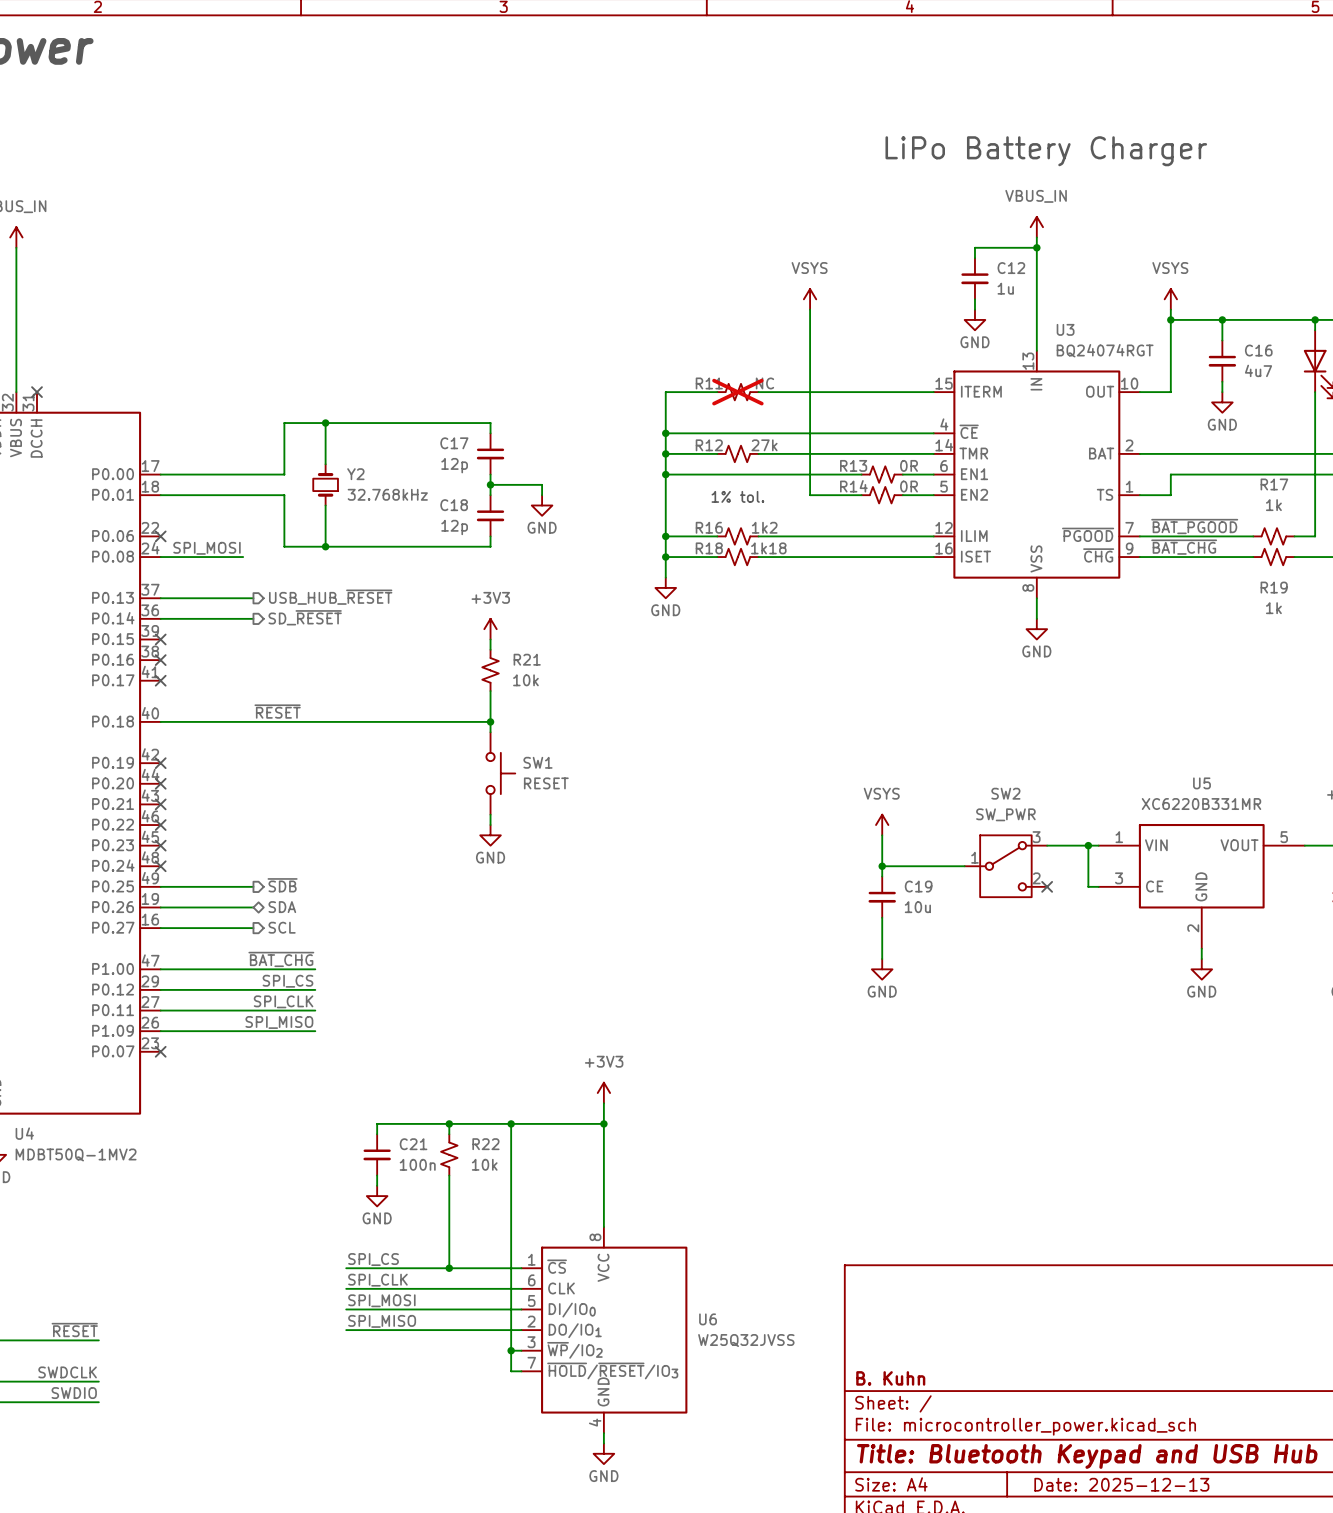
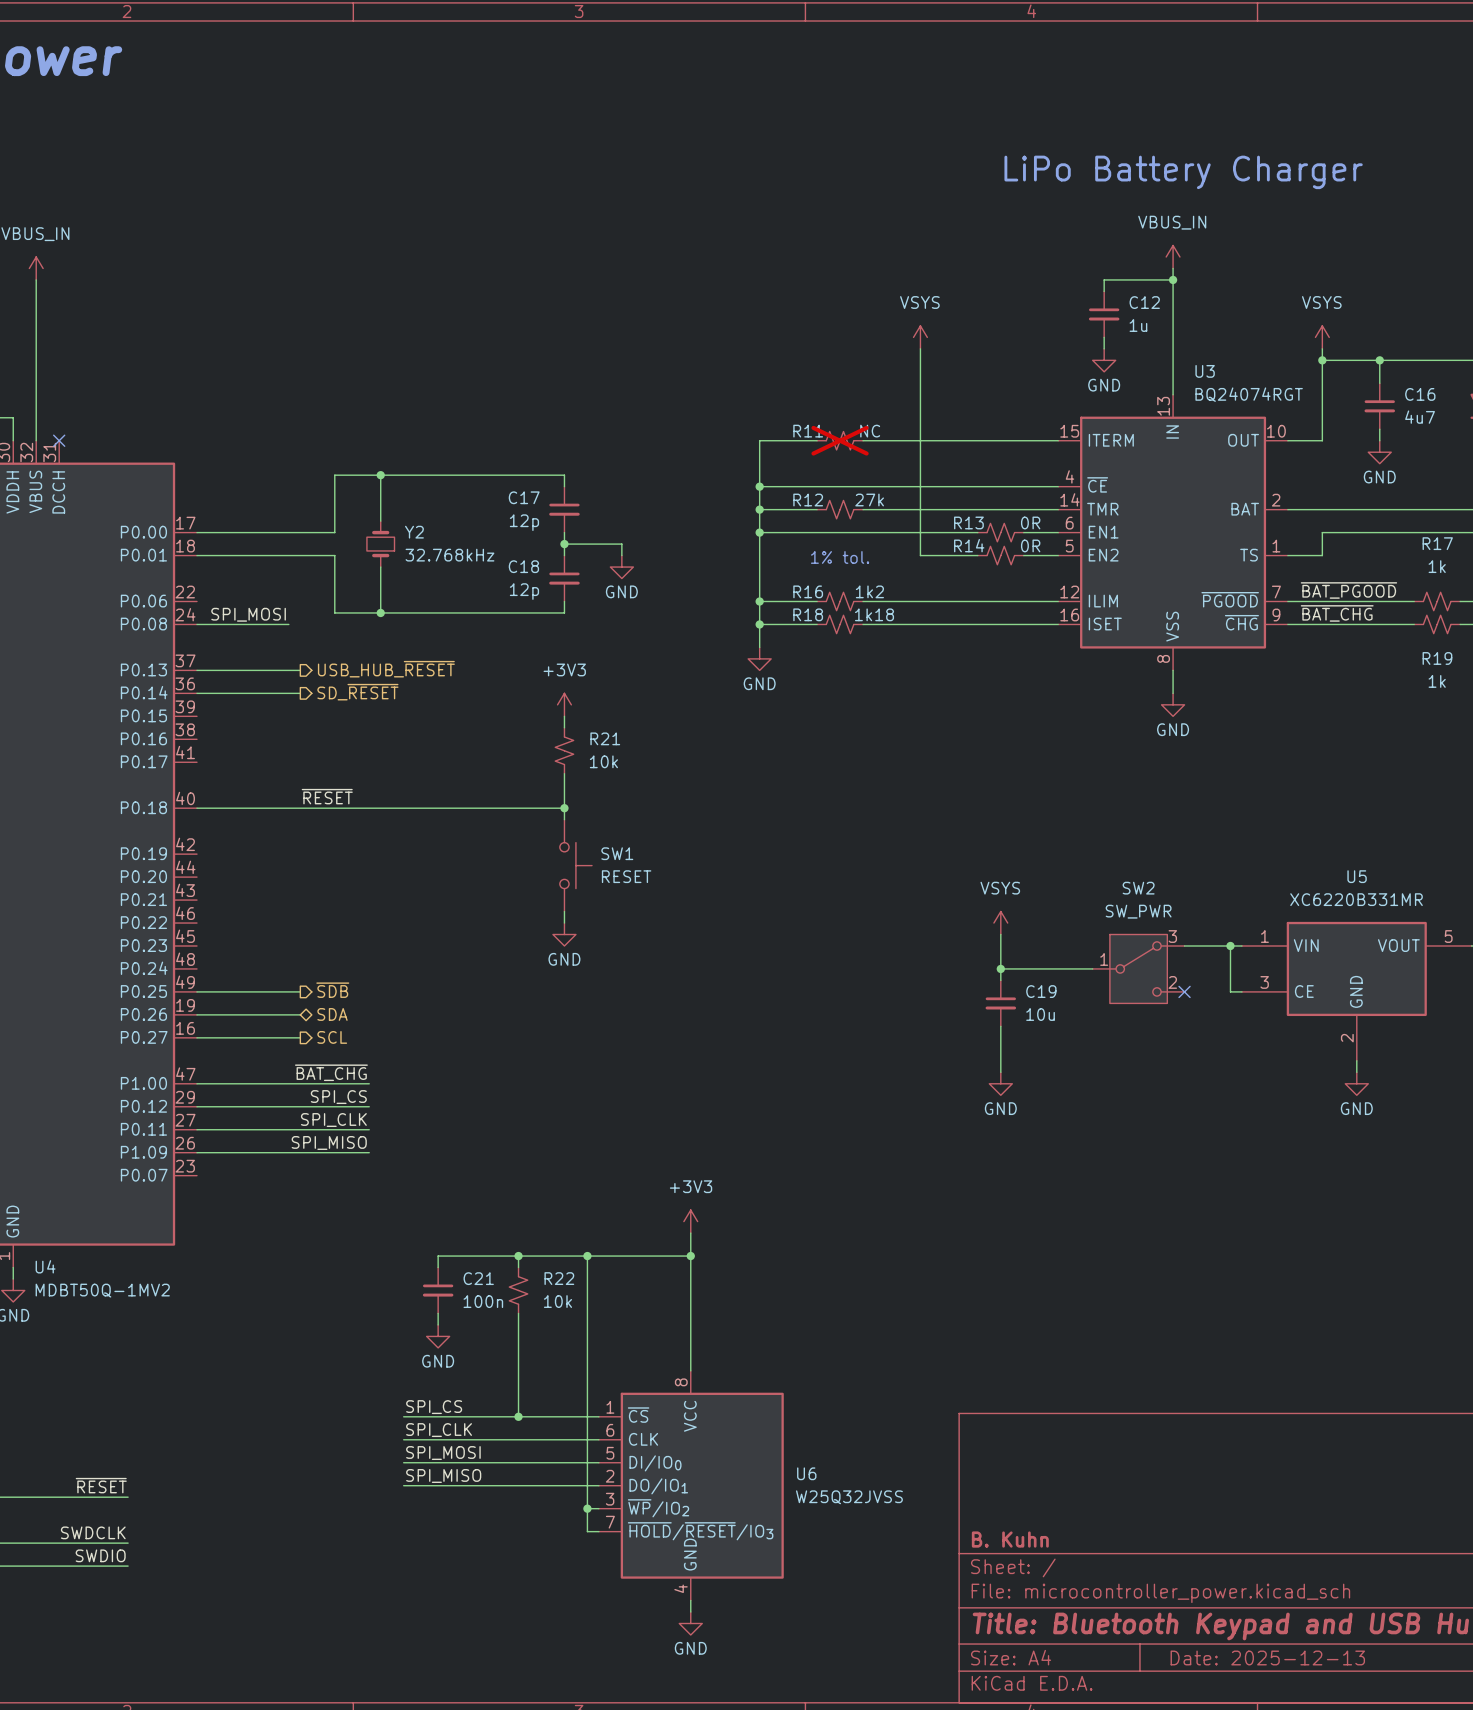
no-connect mark: (160, 536) -> none
no-connect mark: (160, 639) -> none
no-connect mark: (160, 660) -> none
no-connect mark: (160, 680) -> none
no-connect mark: (160, 763) -> none
no-connect mark: (160, 783) -> none
no-connect mark: (160, 804) -> none
no-connect mark: (160, 825) -> none
no-connect mark: (160, 845) -> none
no-connect mark: (160, 866) -> none
no-connect mark: (160, 1051) -> none

